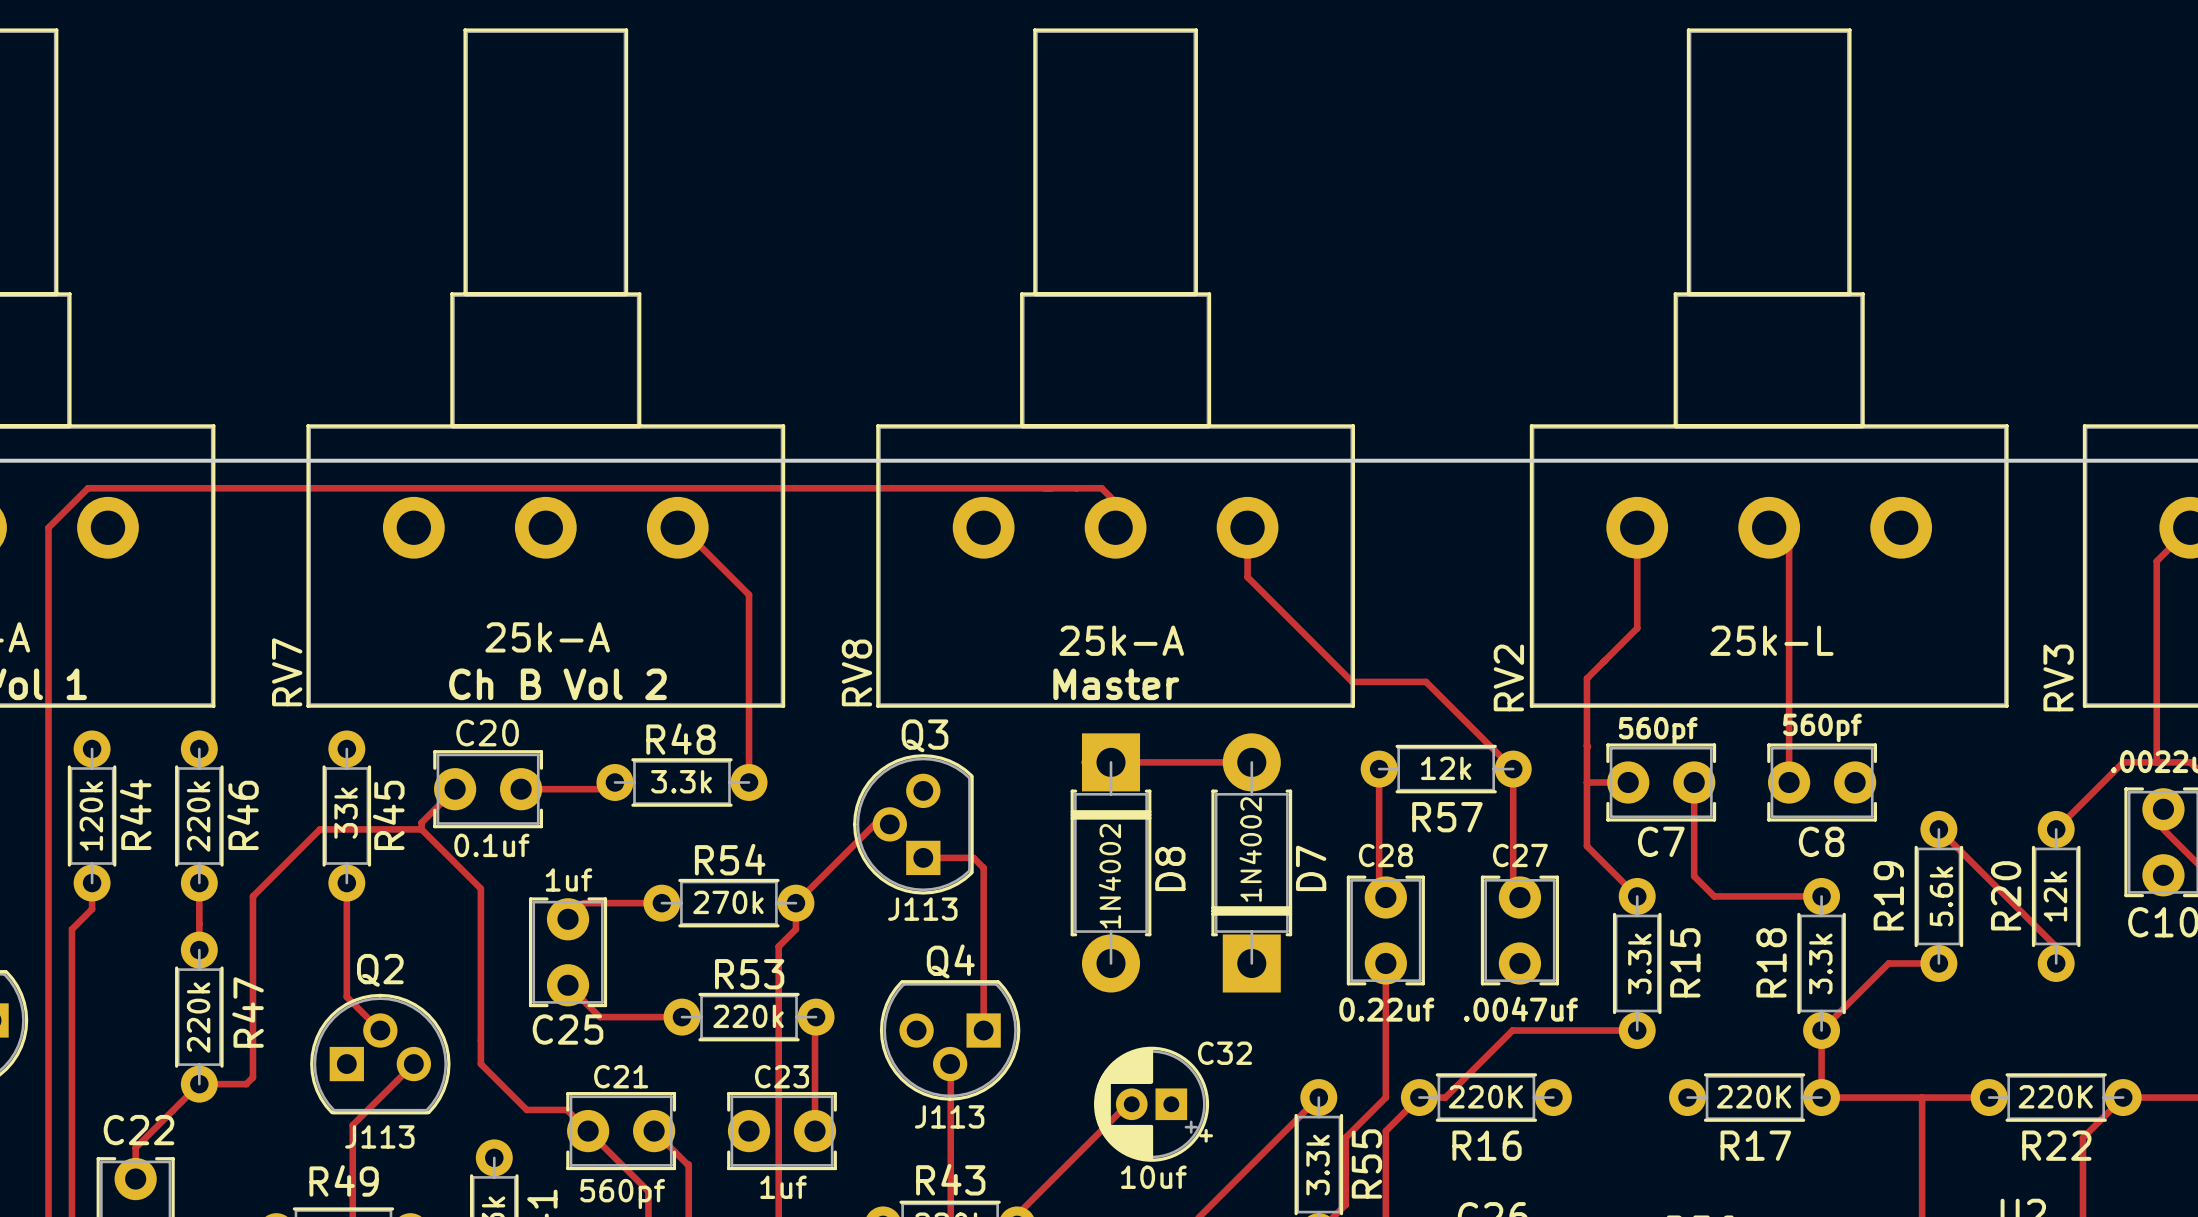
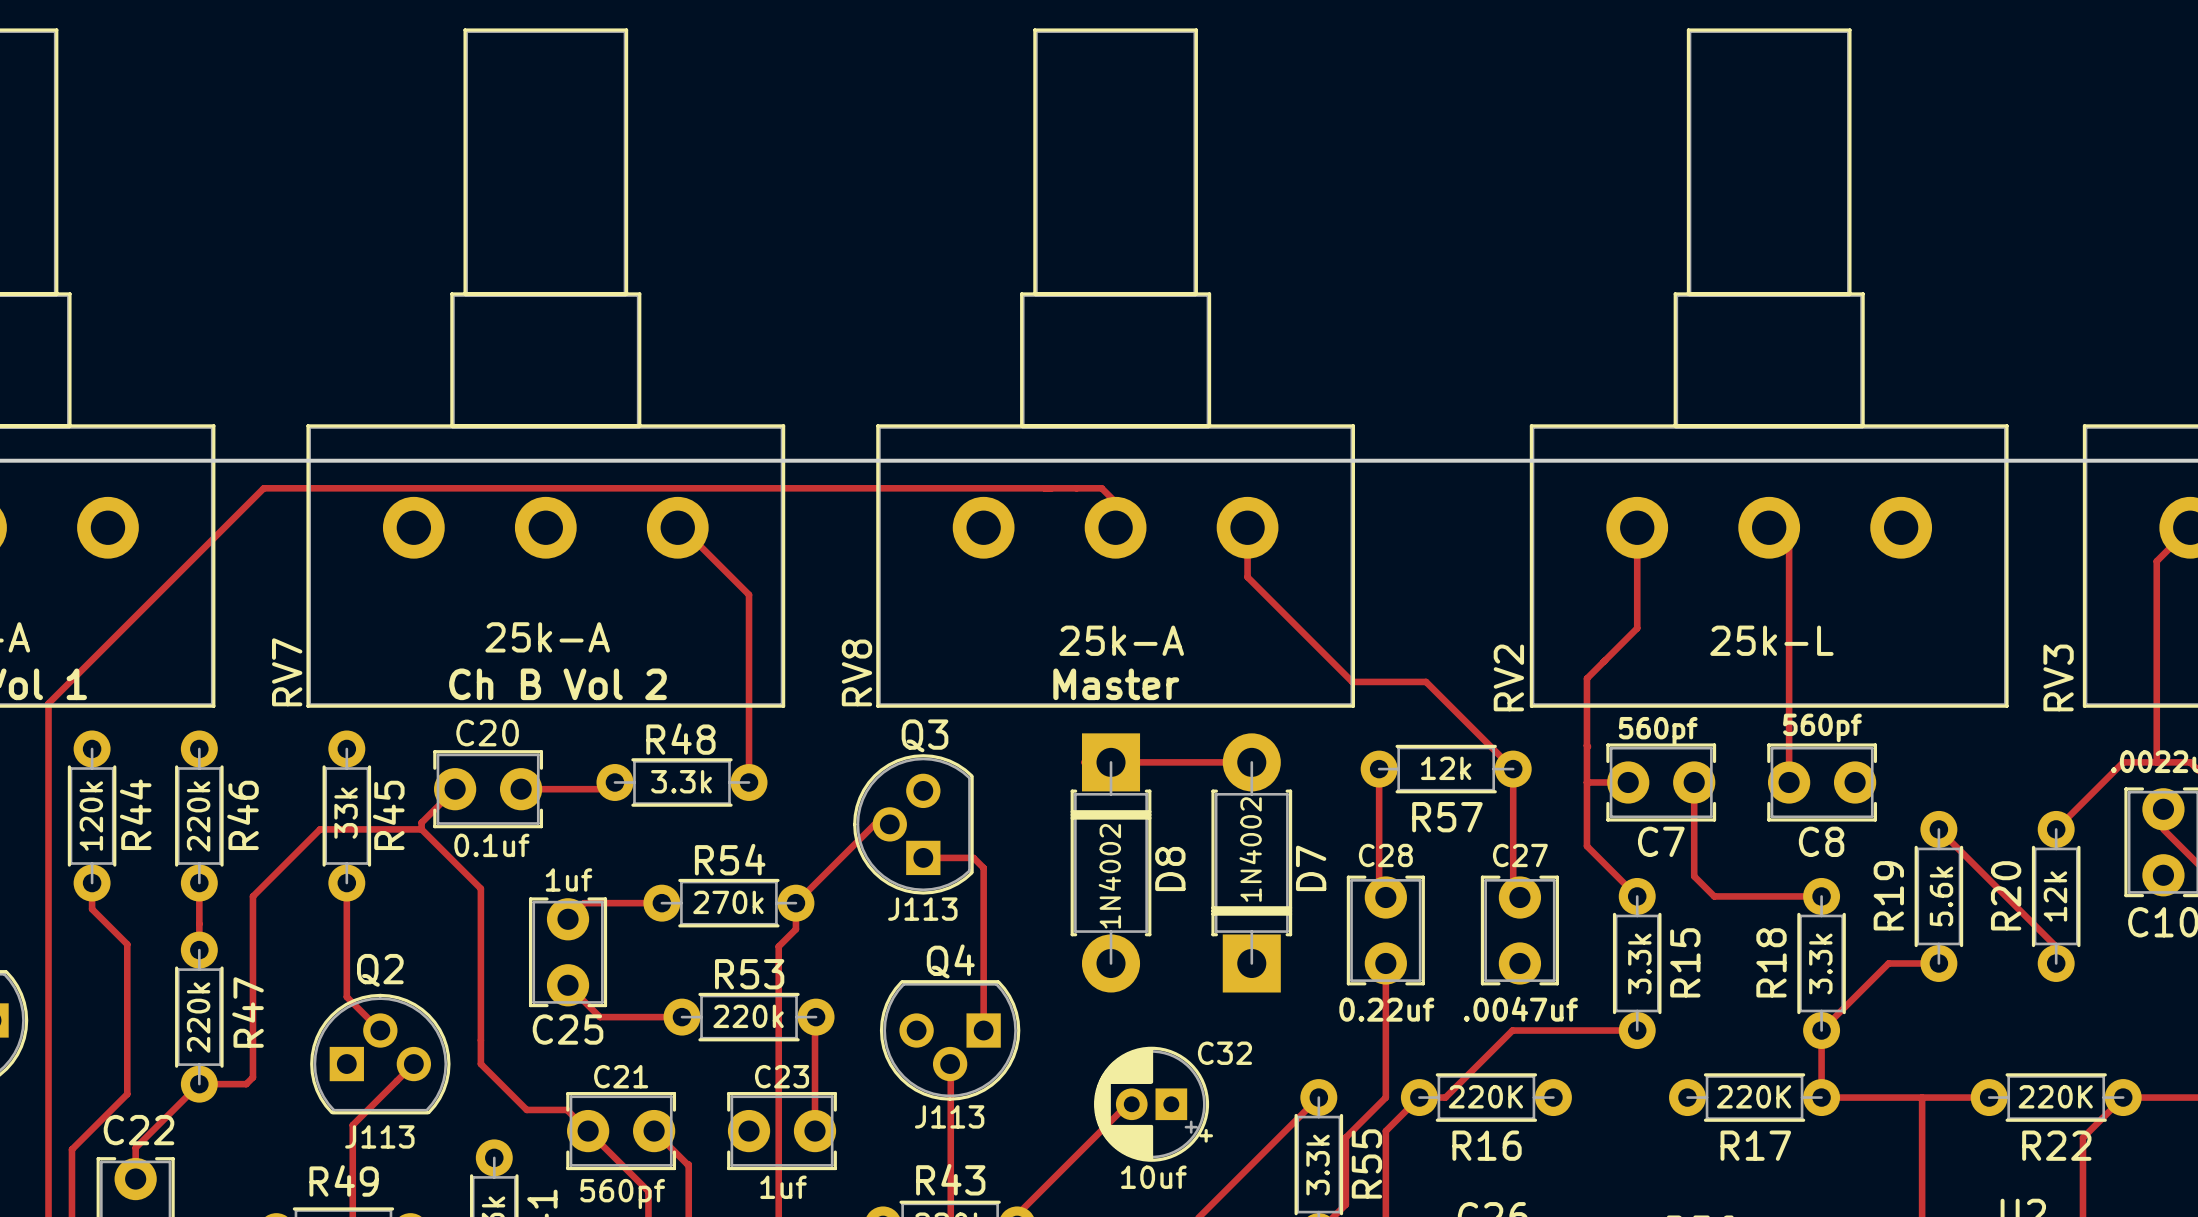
track: (263, 488) (87, 488) (48, 527) (48, 703) -> (263, 488) (48, 703)
track: (92, 909) (71, 929) (71, 1149) -> (92, 909) (127, 944) (127, 1094) (71, 1149)

